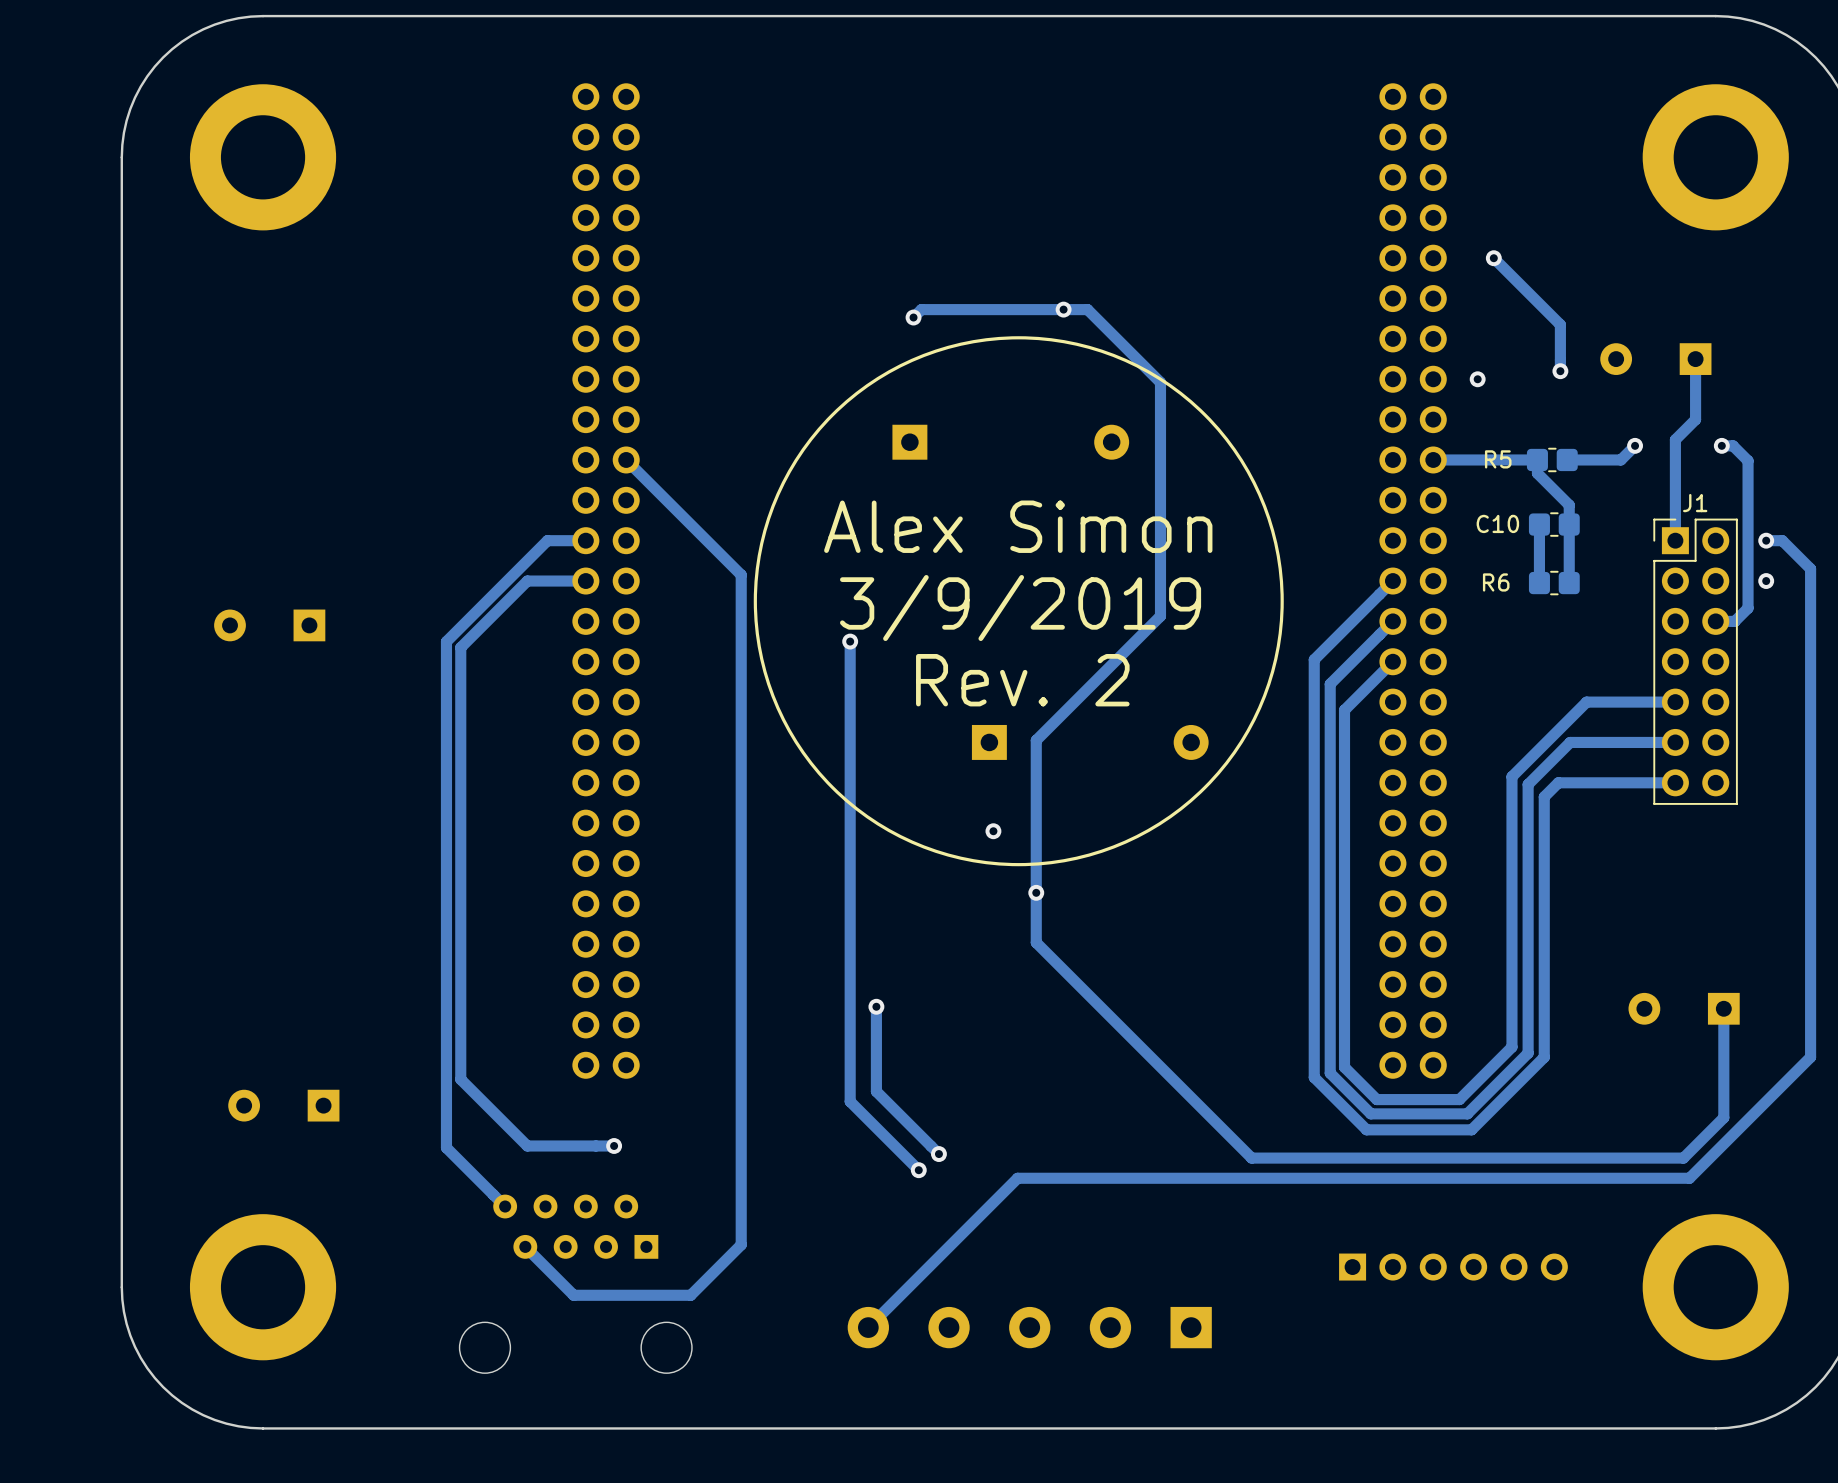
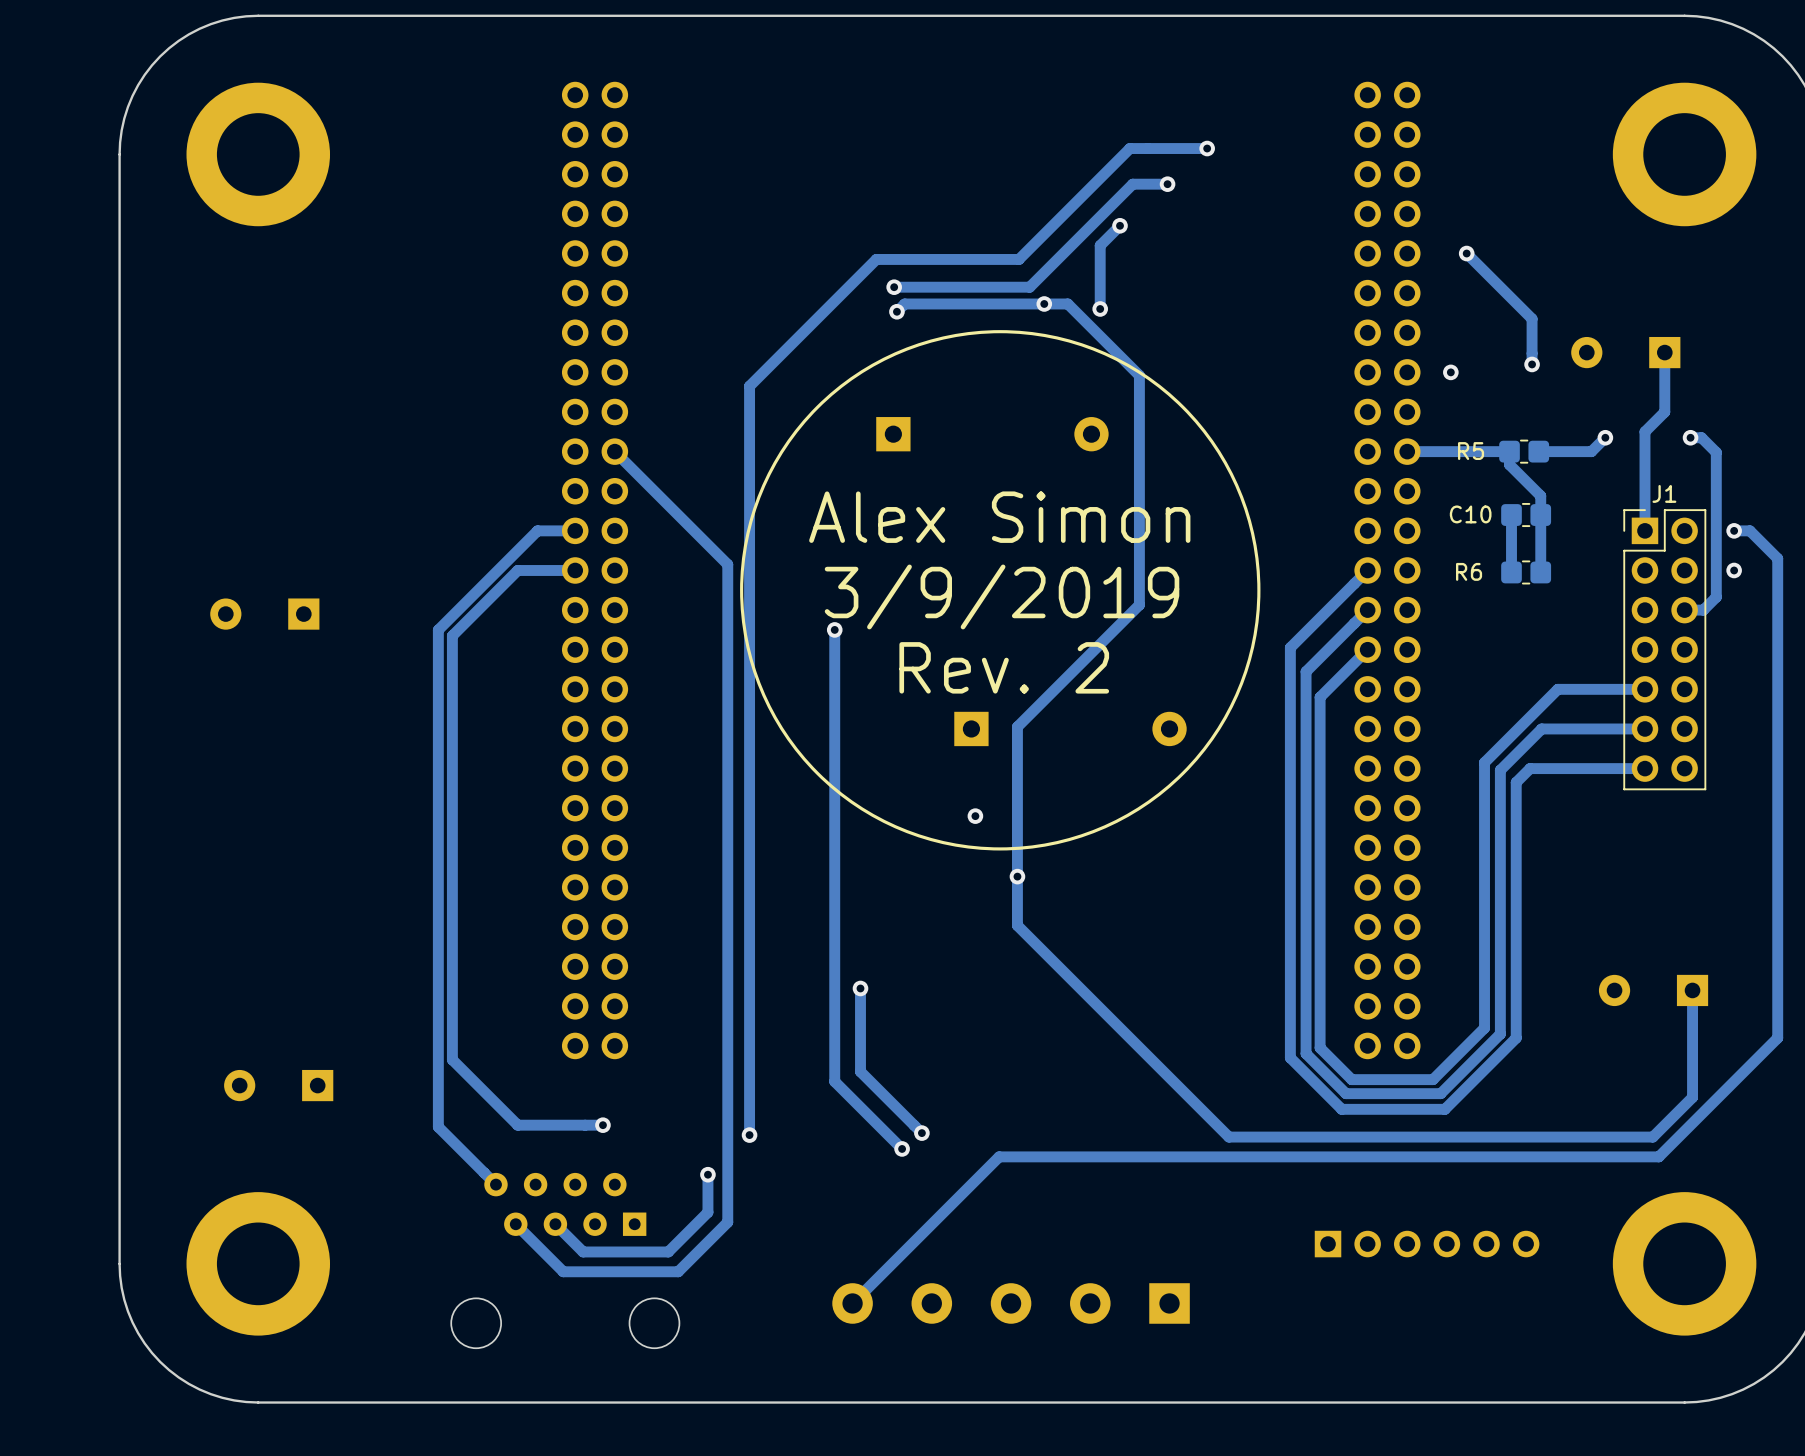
track: none -> (1207, 148) (1129, 148) (1018, 259) (876, 259) (749, 386) (749, 1135)
via: none -> (1207, 148)
track: none -> (1167, 184) (1132, 184) (1029, 287) (894, 287)
via: none -> (1167, 184)
track: none -> (1120, 225) (1100, 245) (1100, 308)
via: none -> (1120, 225)
via: none -> (894, 287)
via: none -> (1100, 308)
via: none -> (749, 1135)
track: none -> (707, 1174) (707, 1212) (668, 1251) (583, 1251) (555, 1224)
via: none -> (707, 1174)

